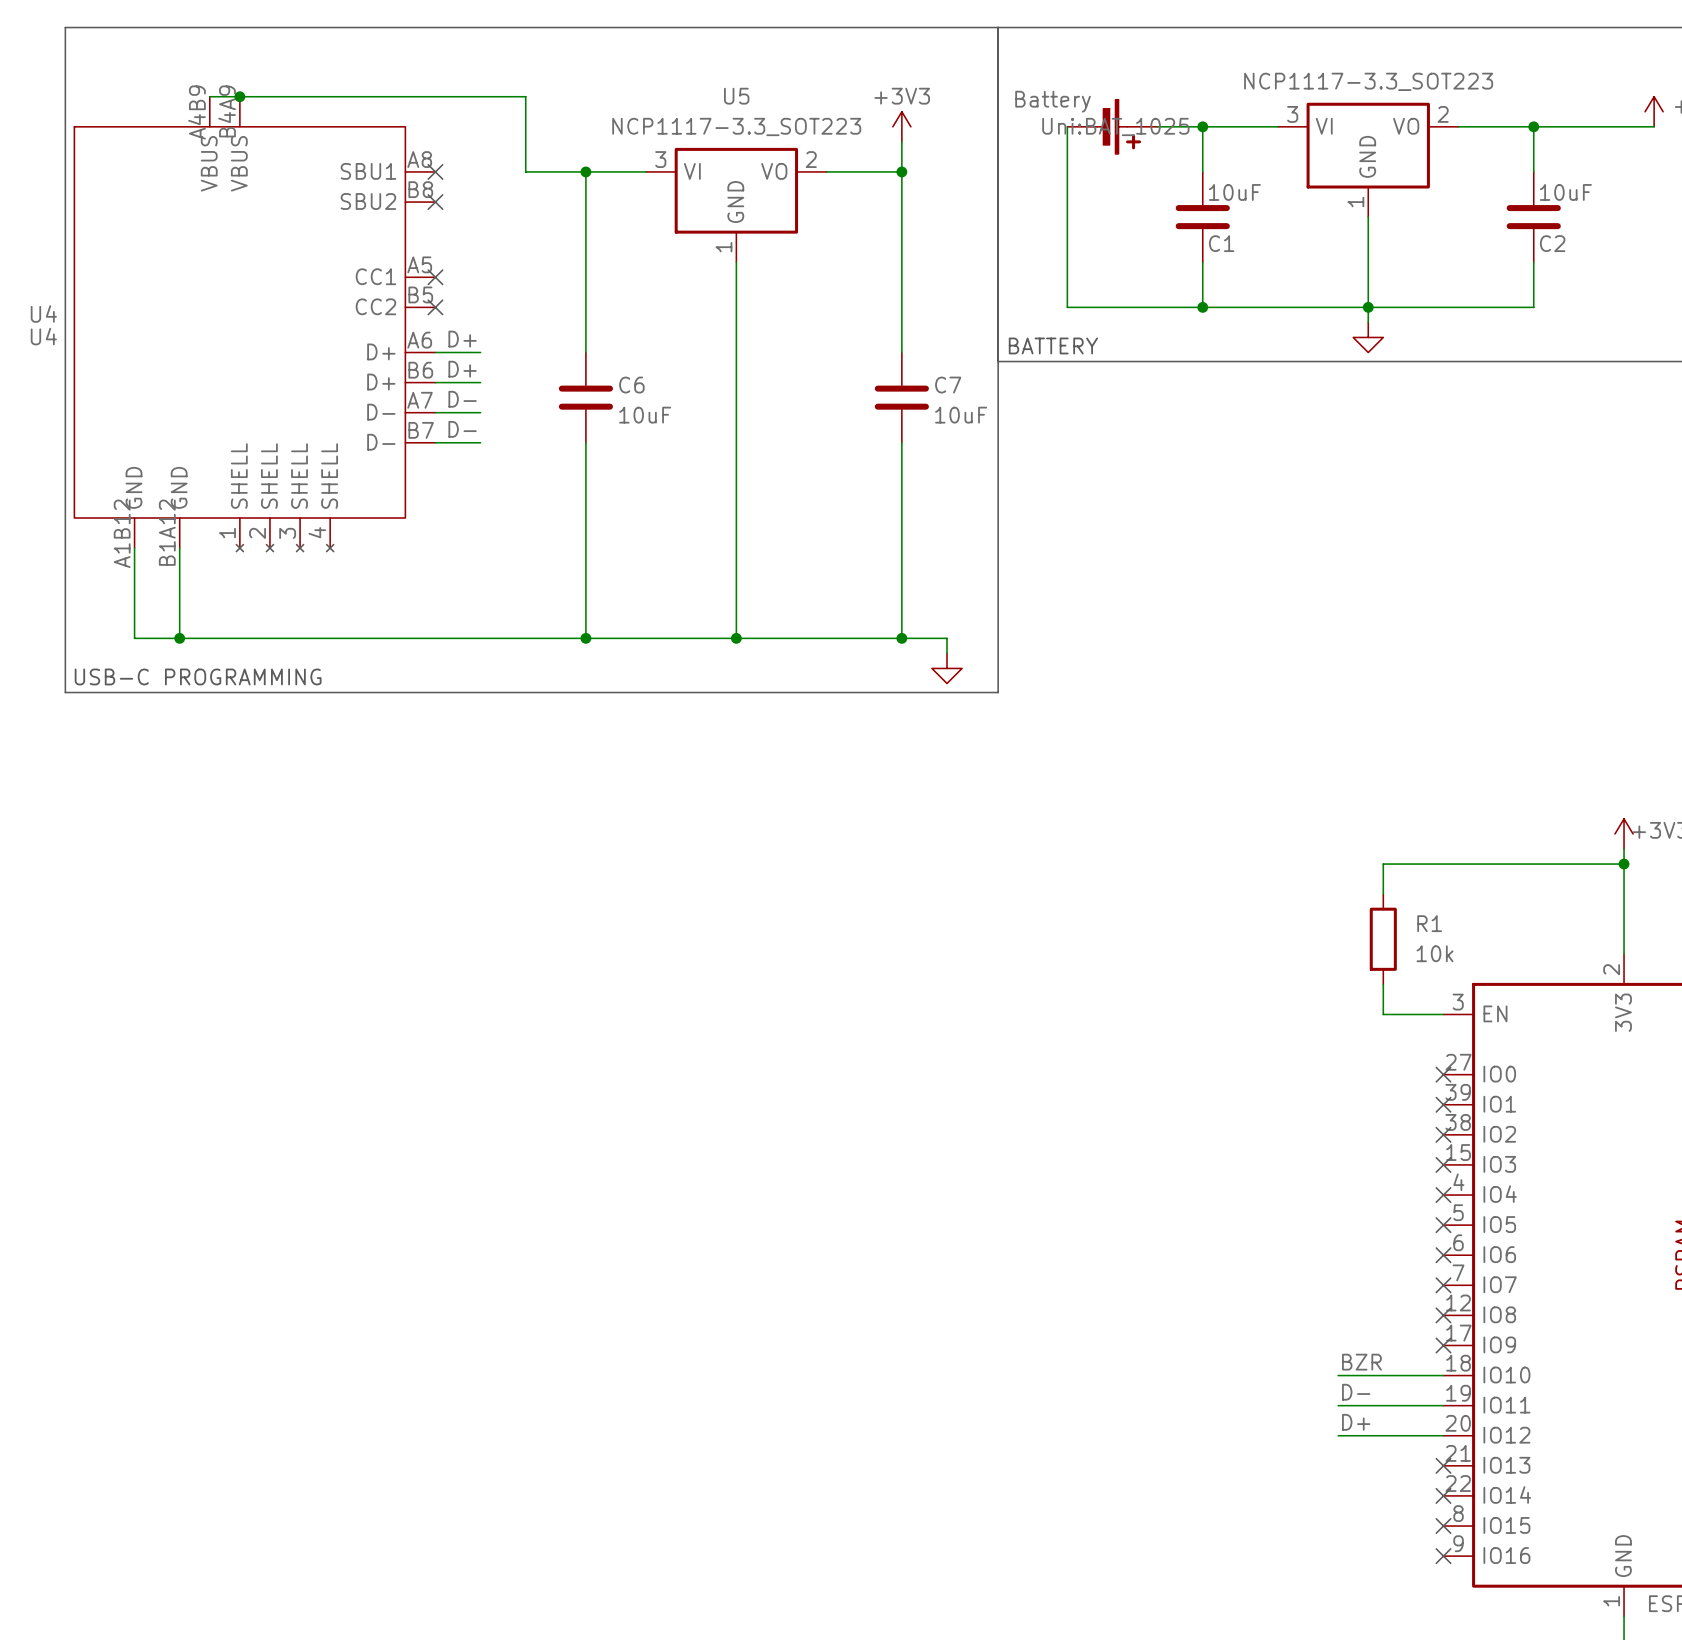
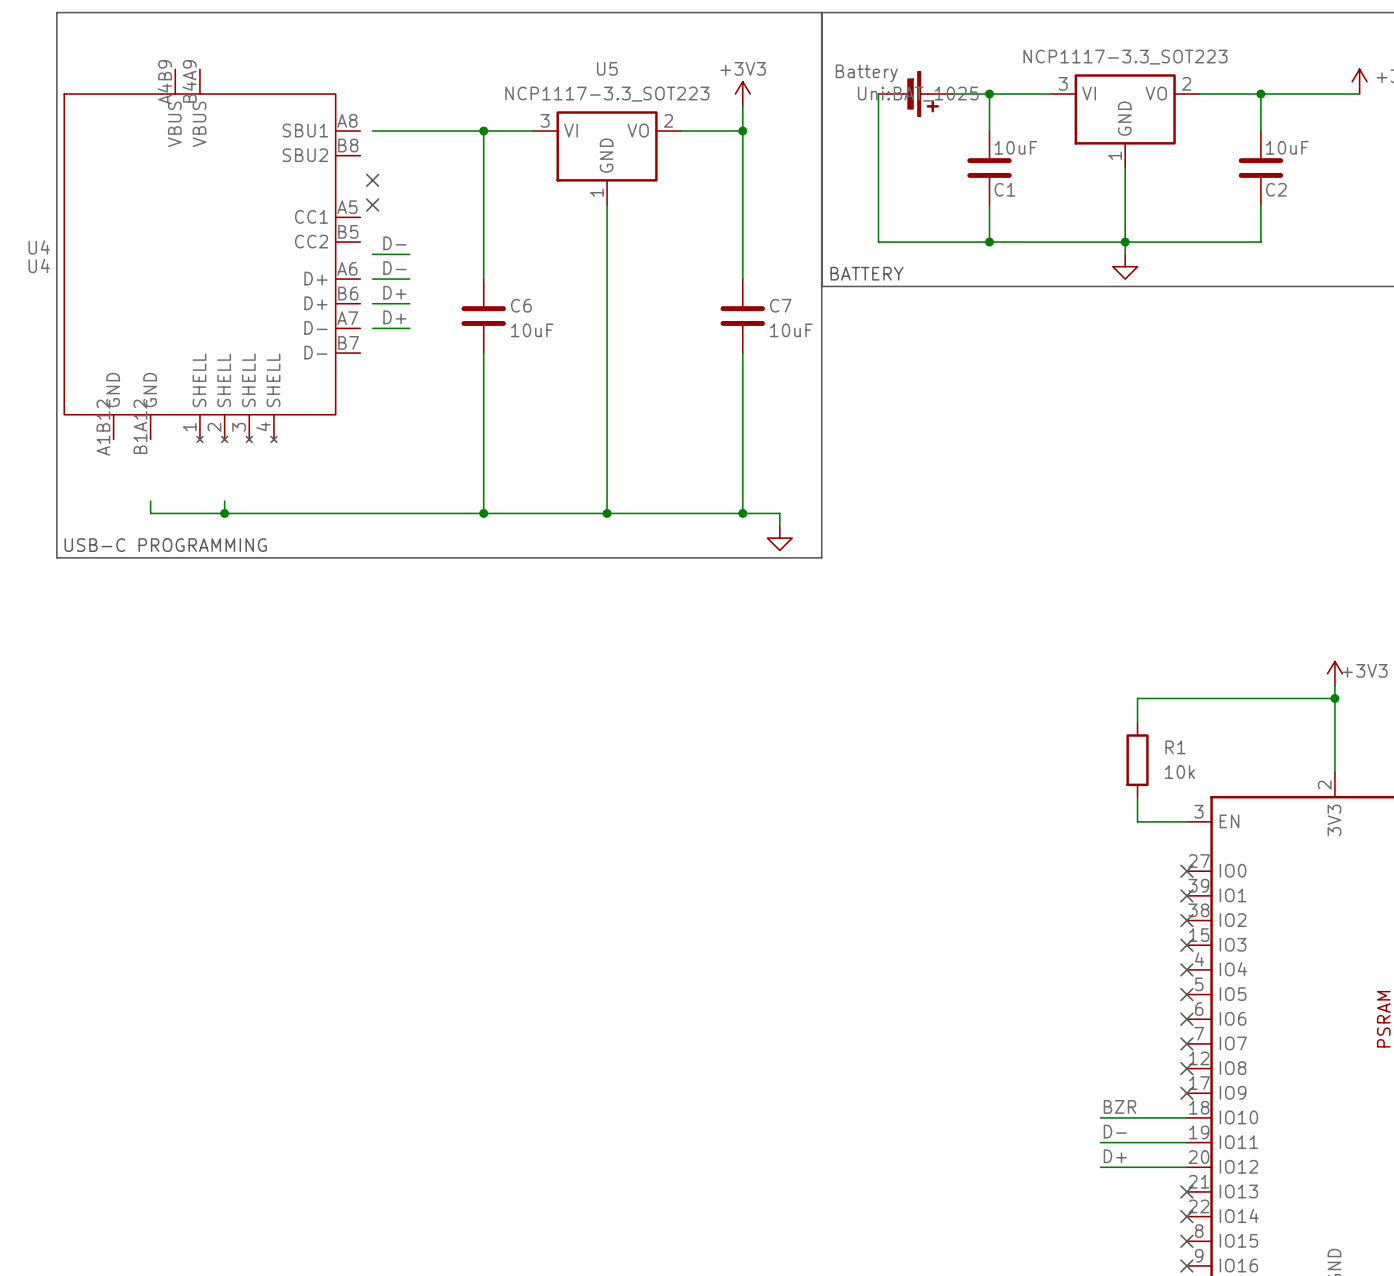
wire: (209, 96) (525, 96) (525, 171) -> (372, 131) (434, 131)
junction: (239, 96) -> none
no-connect mark: (435, 171) -> none
no-connect mark: (435, 202) -> none
no-connect mark: none -> (372, 180)
no-connect mark position: (435, 277) -> (372, 205)
no-connect mark: (435, 307) -> none
label: none -> D- (394, 243)
label: D+ (462, 339) -> none
label: none -> D- (394, 268)
wire: (435, 352) (450, 352) -> (397, 279) (409, 279)
label position: D+ (462, 369) -> D+ (394, 292)
wire: (435, 382) (450, 382) -> (397, 303) (409, 303)
label: D- (462, 399) -> none
label: none -> D+ (394, 317)
wire: (435, 412) (450, 412) -> (397, 328) (409, 328)
label: D- (462, 429) -> none
wire: (435, 442) (480, 442) -> (372, 254) (409, 254)
wire: (134, 548) (134, 638) (179, 638) -> none
wire: (179, 548) (179, 623) -> none
wire: none -> (224, 501) (224, 513)
junction: (179, 638) -> none
junction: none -> (224, 513)

